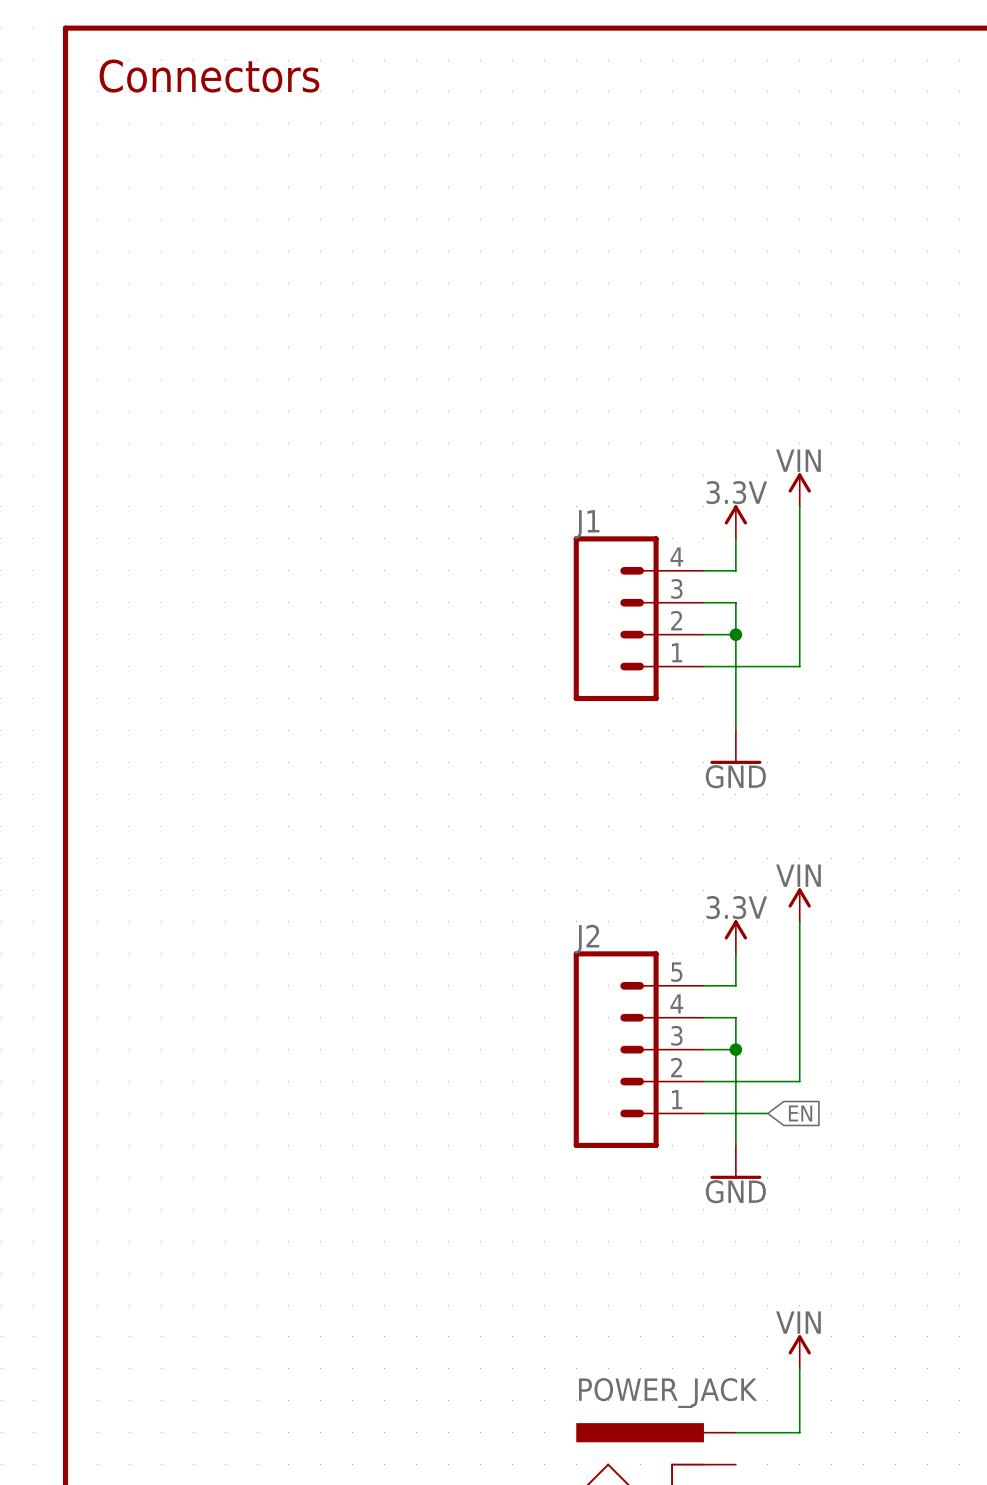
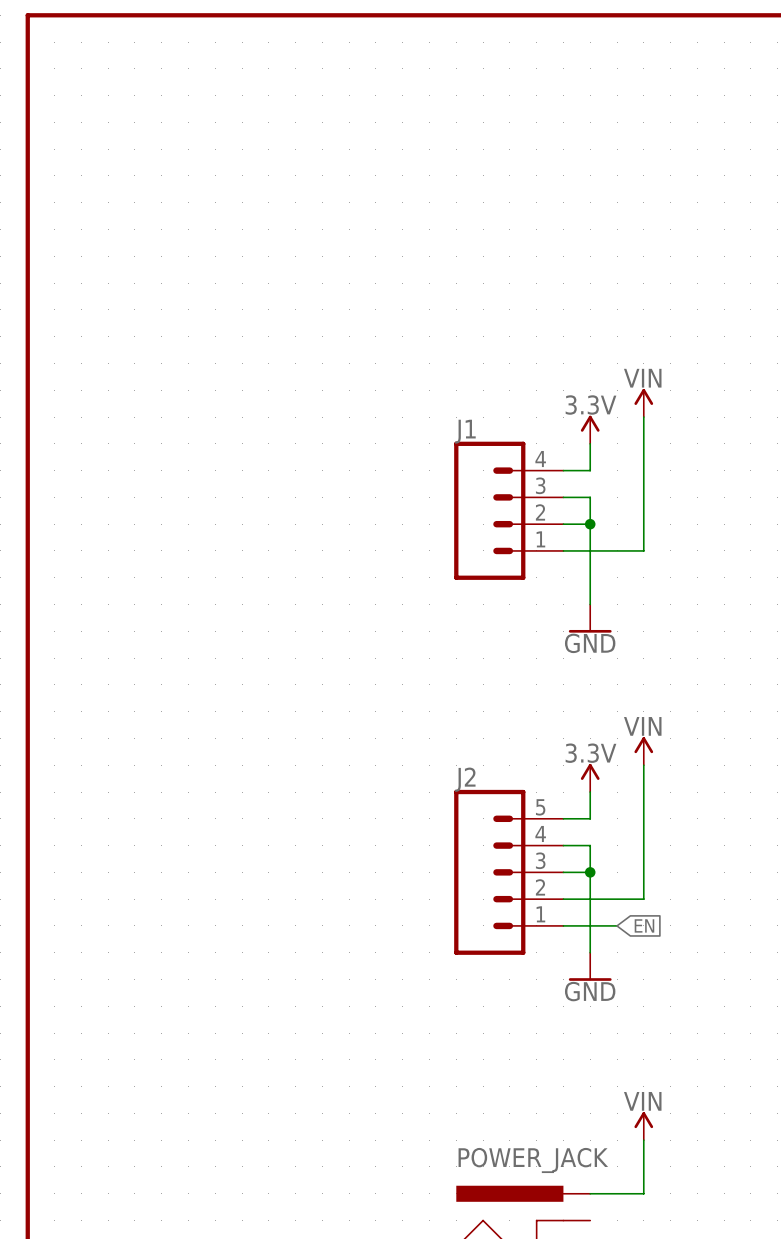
text: Connectors (209, 76) -> none

